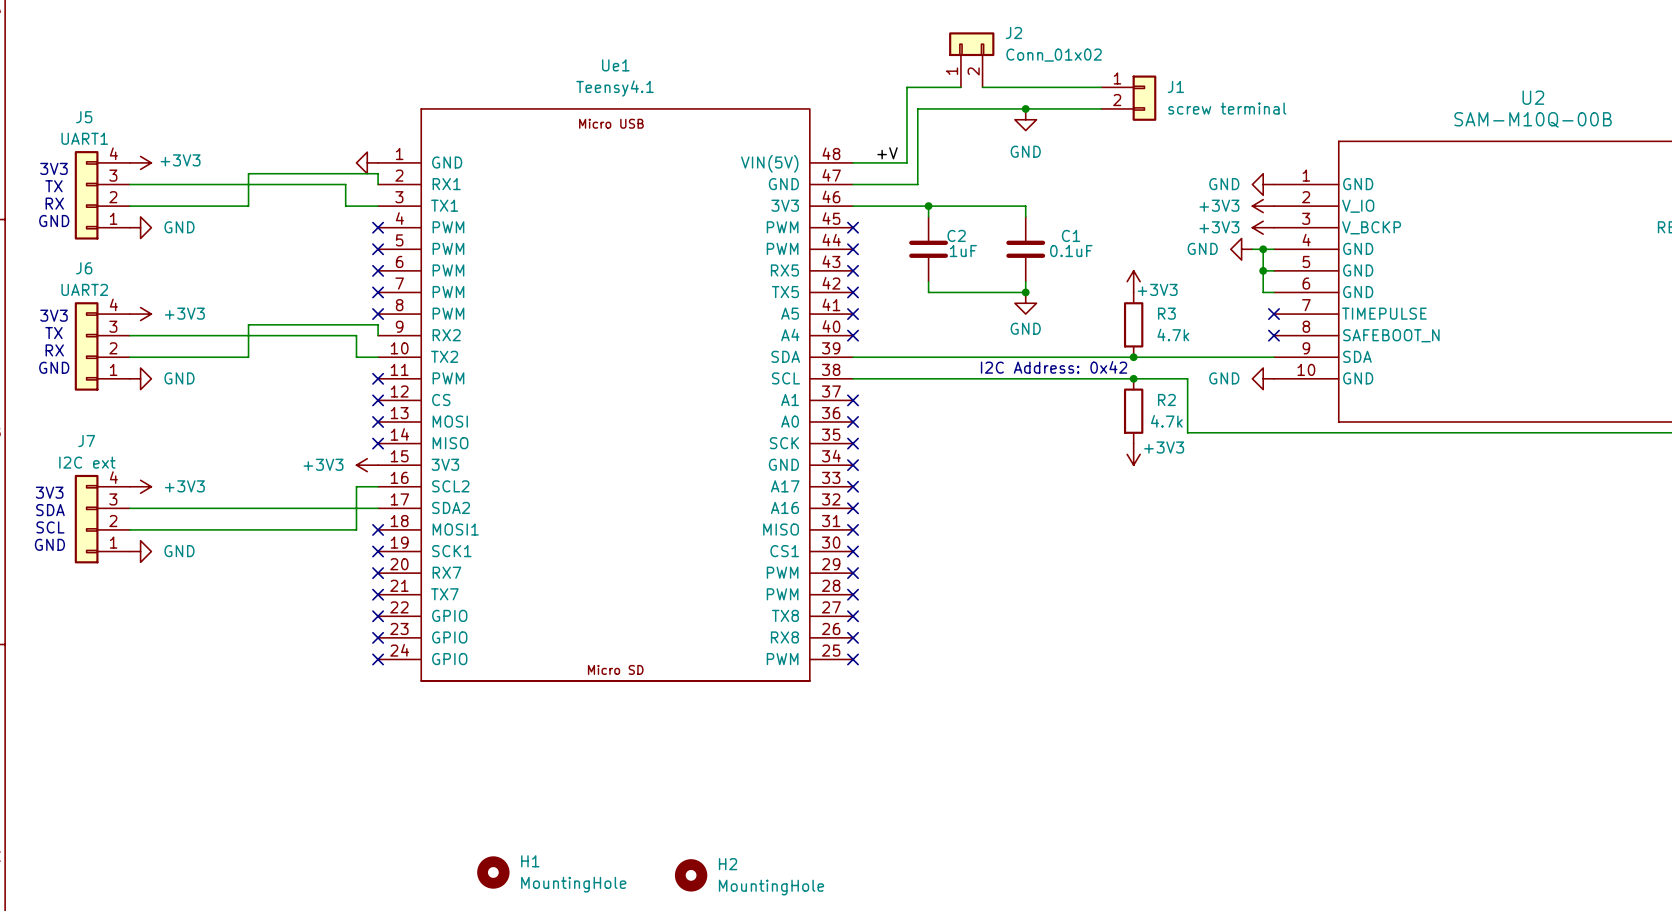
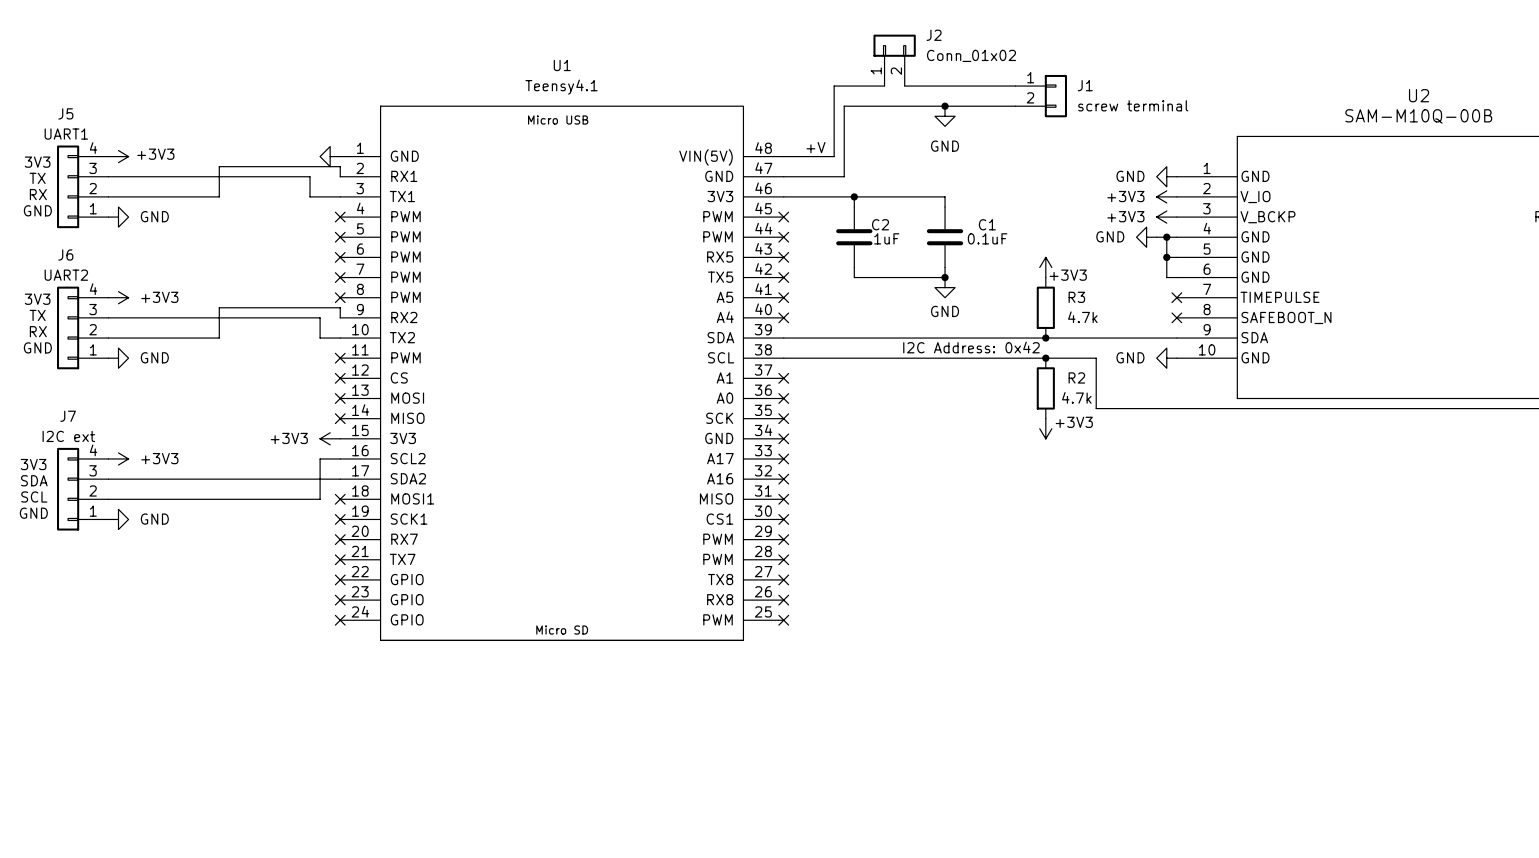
Ue1 name: Ue1 (615, 65) -> U1 (562, 65)
H1: MountingHole (493, 872) -> none
H2: MountingHole (691, 875) -> none

